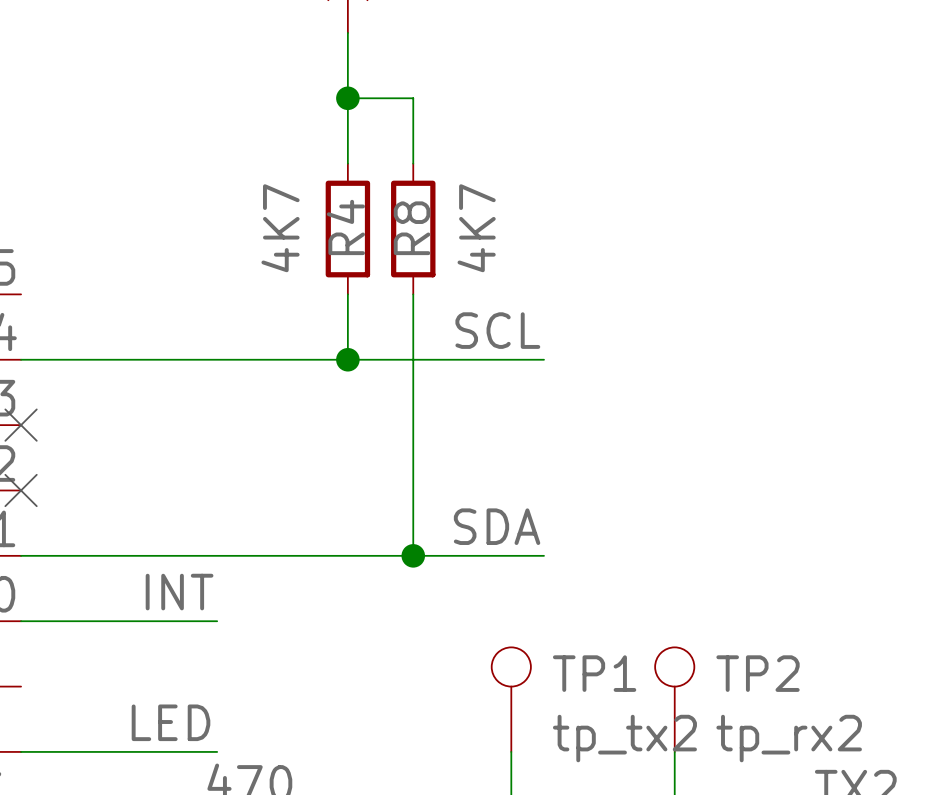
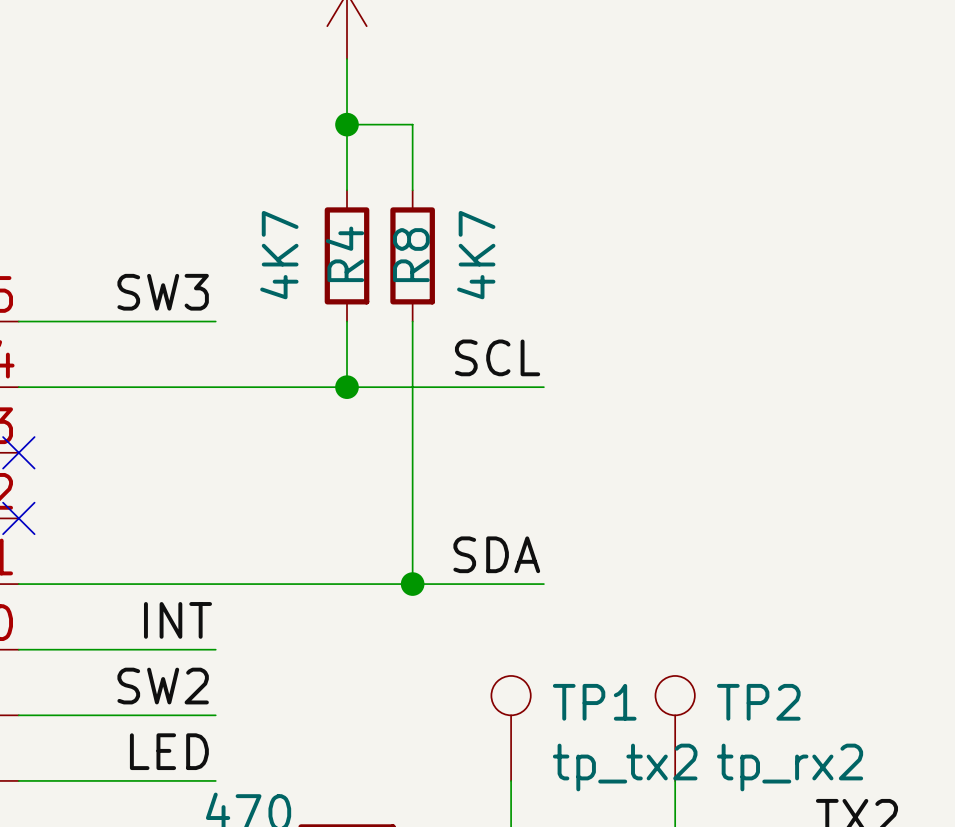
label: none -> SW3 (163, 292)
wire: none -> (18, 321) (215, 321)
label: none -> SW2 (163, 686)
wire: none -> (18, 715) (215, 715)

